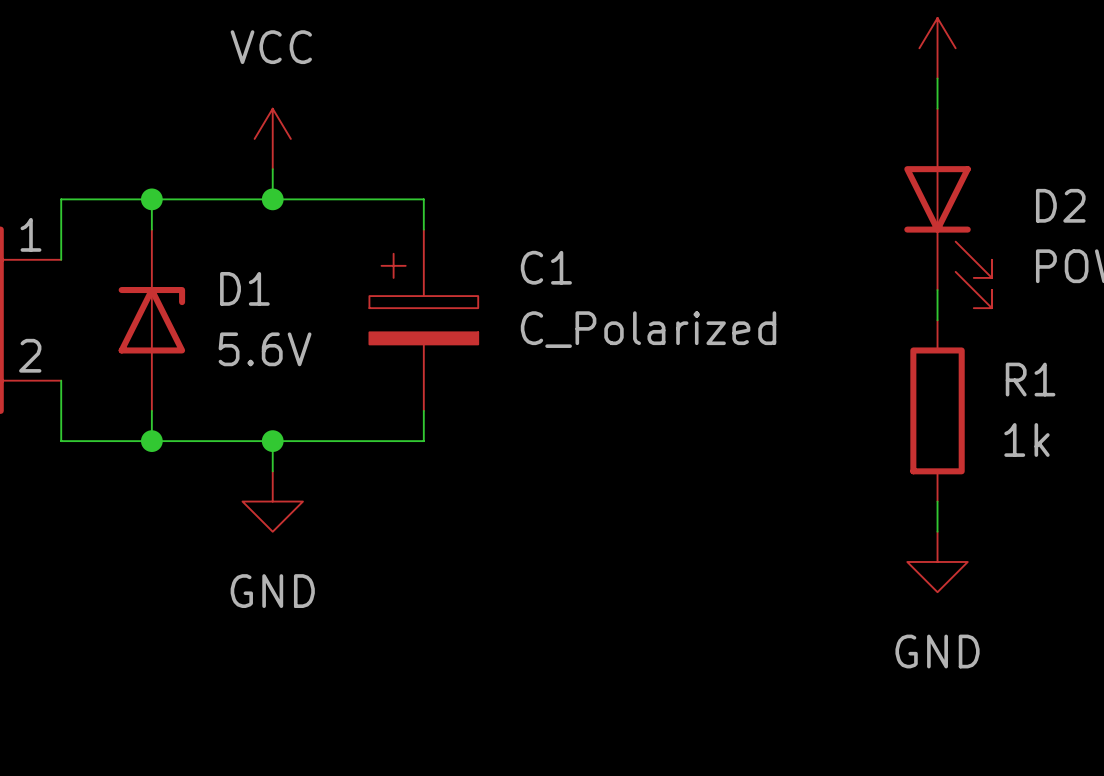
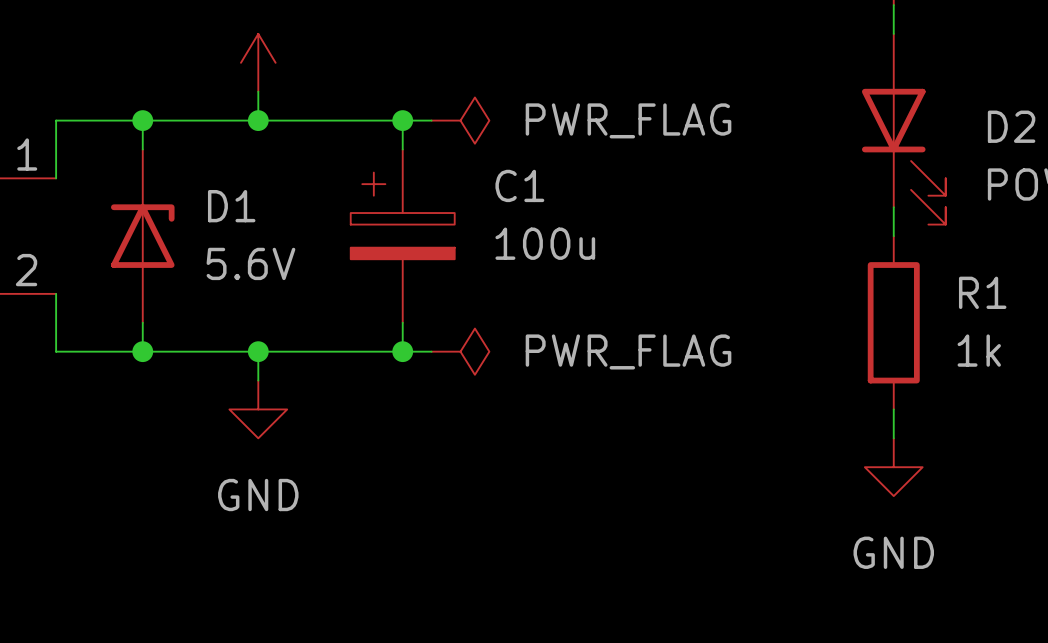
wire: none -> (402, 120) (431, 120)
junction: none -> (402, 120)
power symbol: none -> PWR_FLAG (460, 120)
C1 value: C_Polarized (648, 329) -> 100u (545, 243)
wire: none -> (402, 351) (431, 351)
junction: none -> (402, 351)
power symbol: none -> PWR_FLAG (460, 351)

